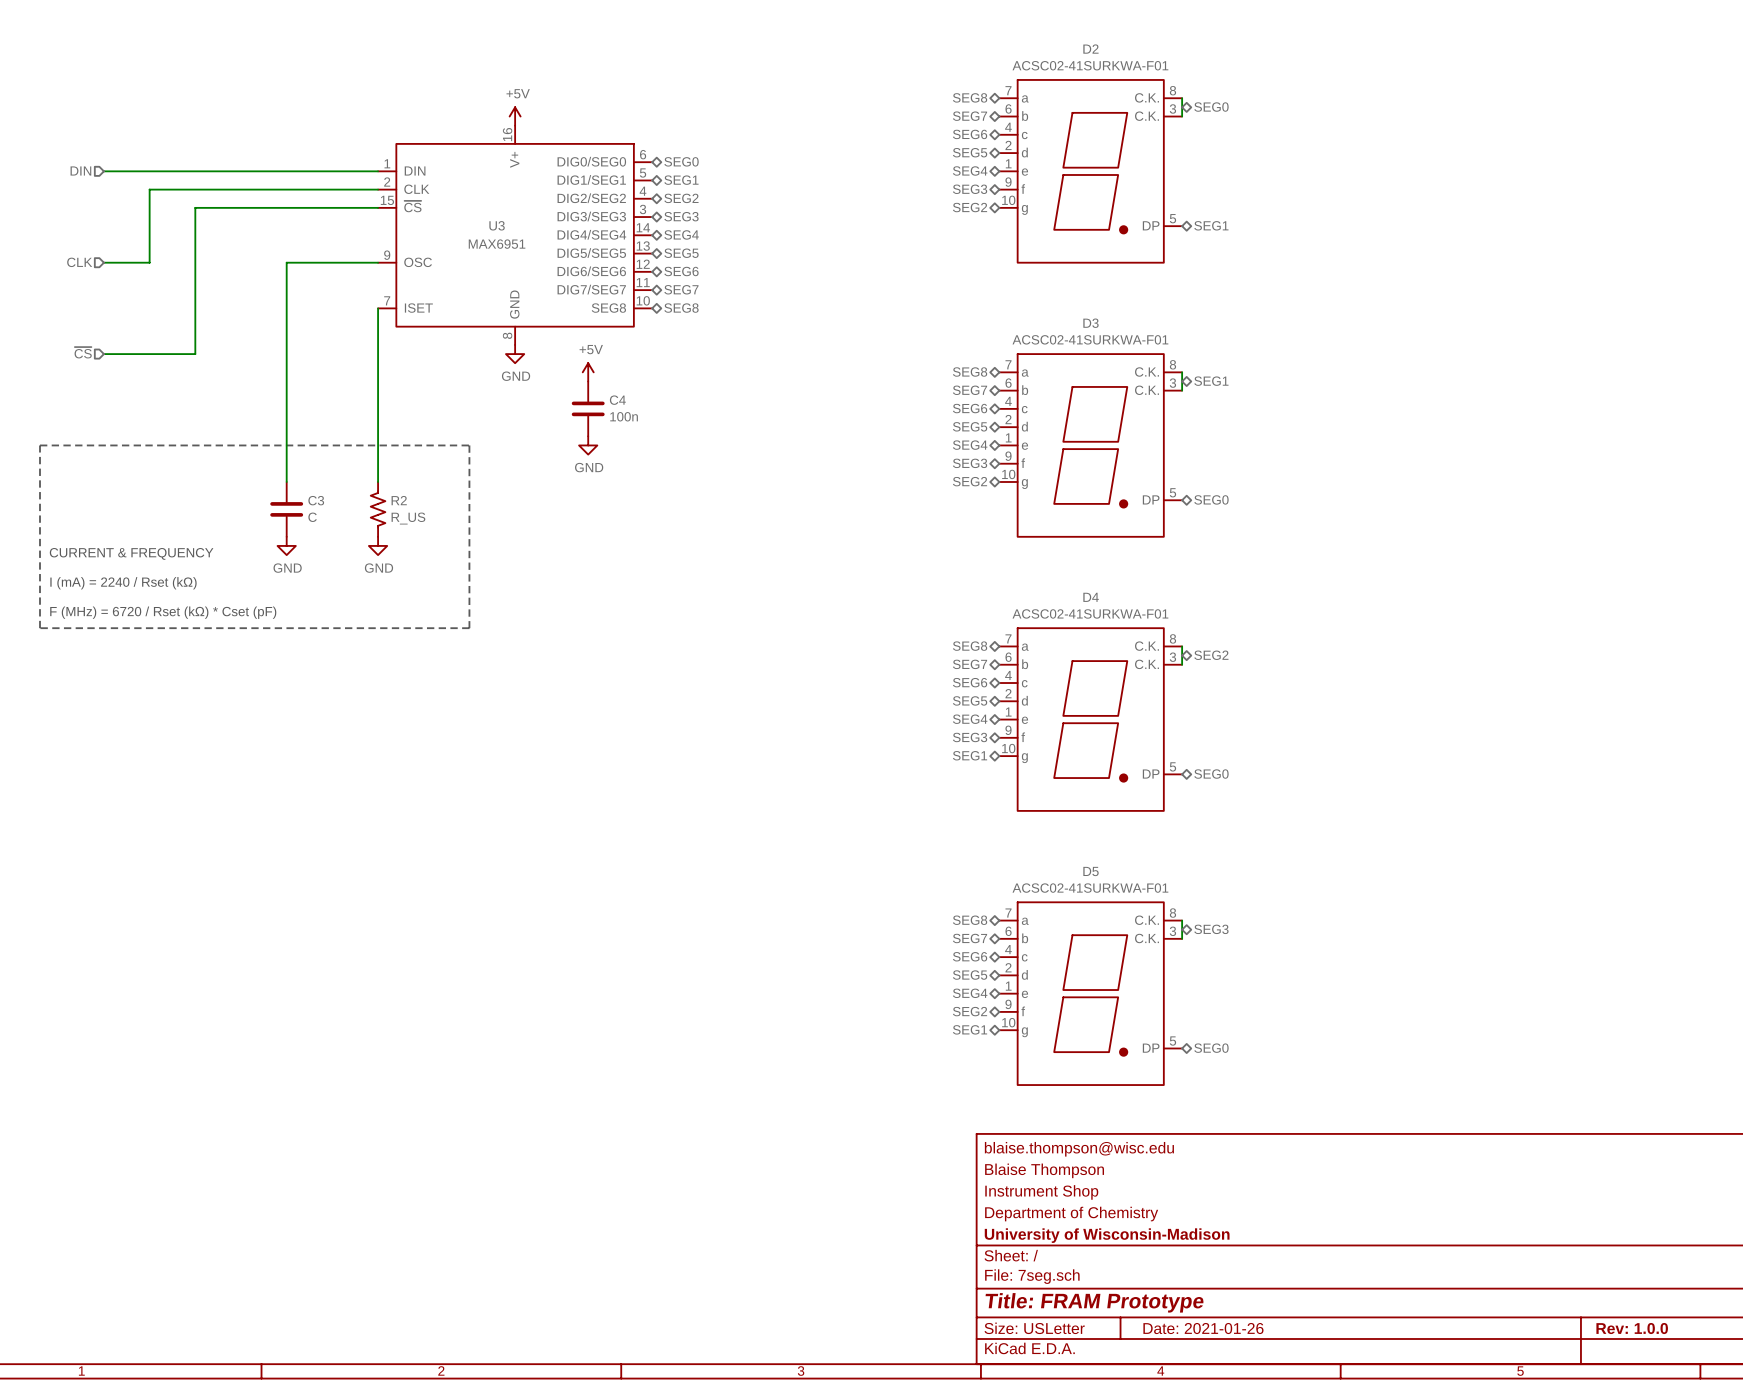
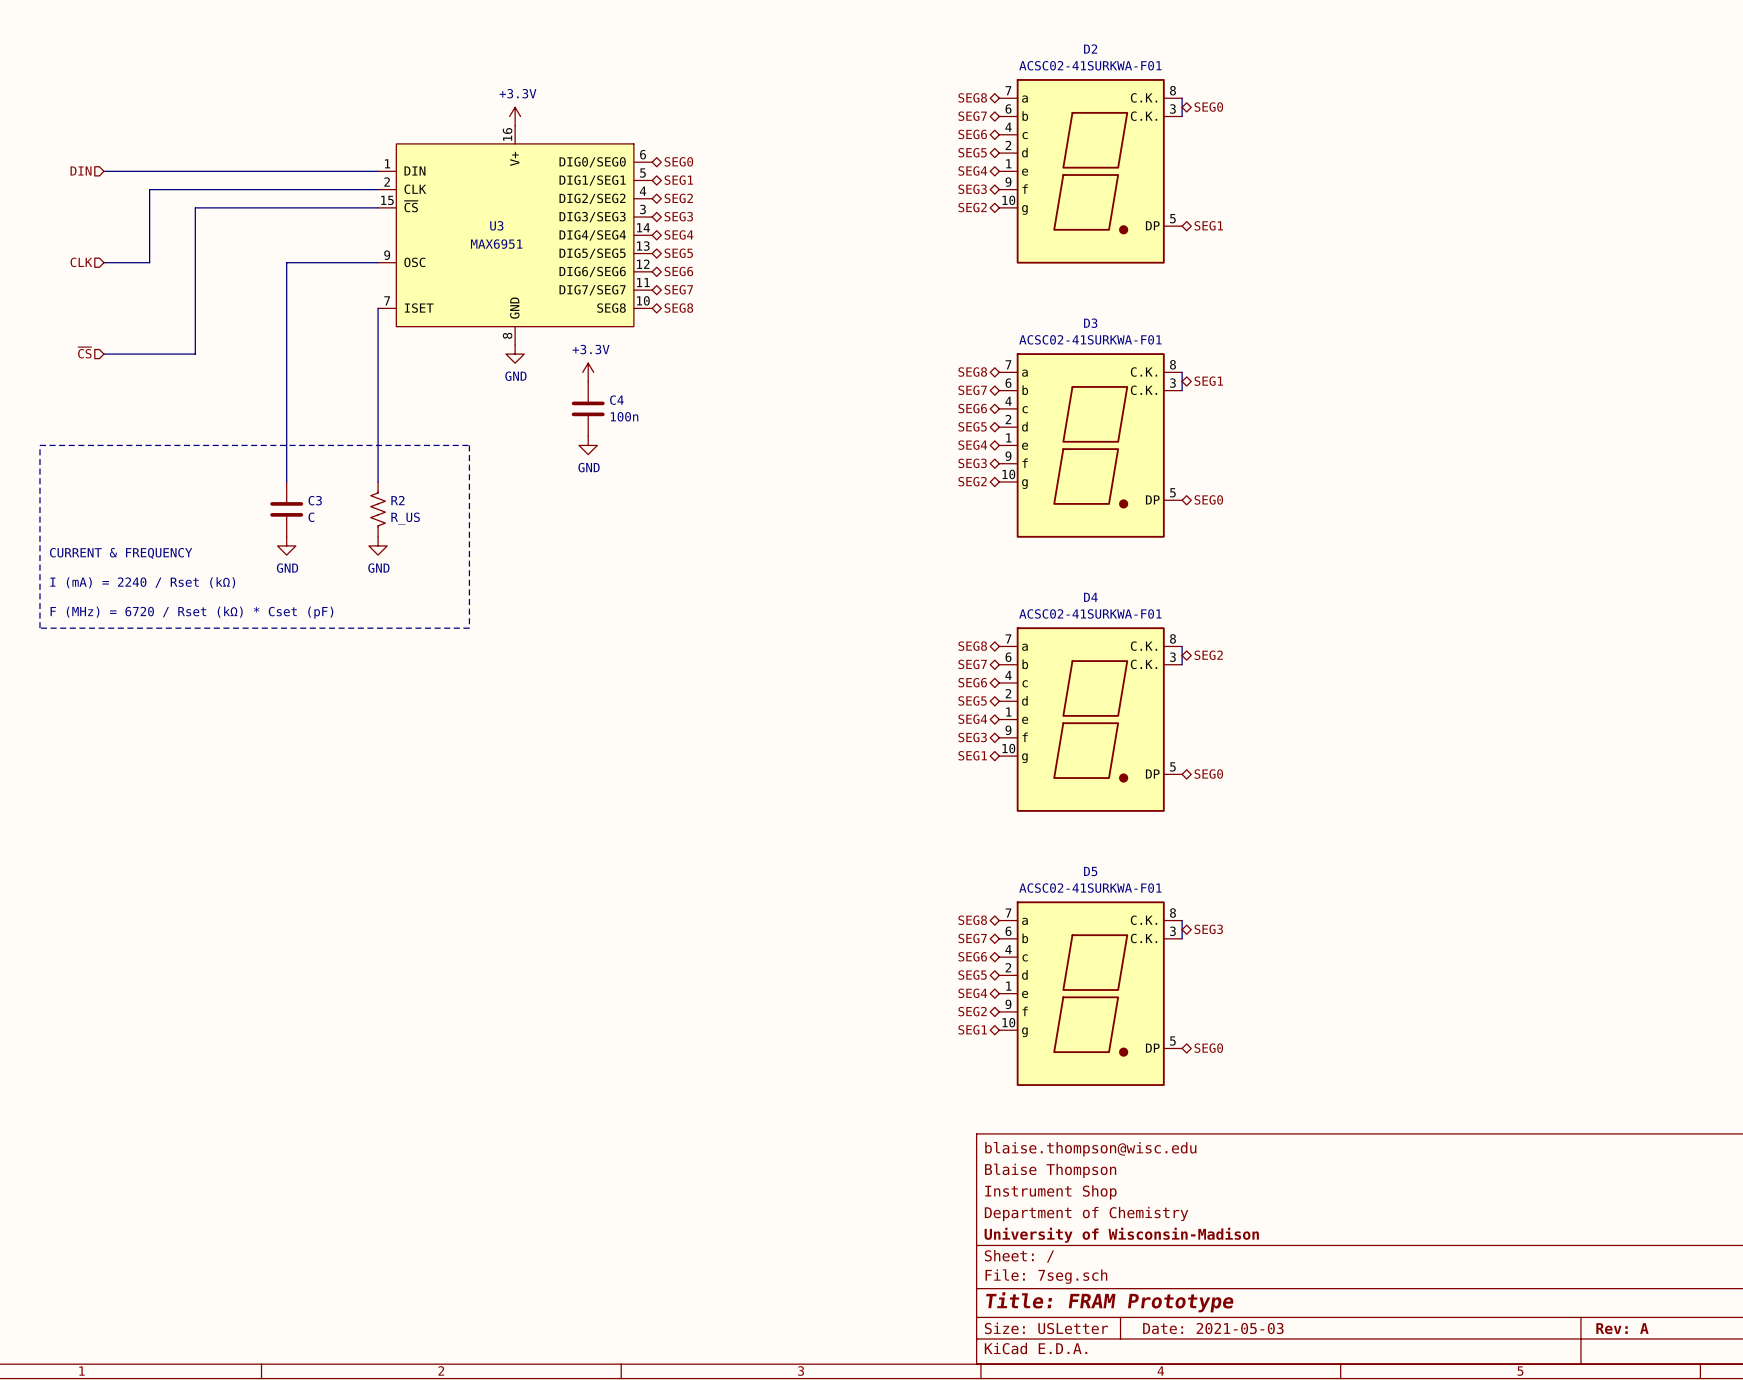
power symbol: +5V (515, 116) -> +3.3V (515, 116)
power symbol: +5V (588, 372) -> +3.3V (588, 372)
title block: Date: 2021-01-26 (1203, 1328) -> Date: 2021-05-03 (1213, 1328)
title block: Rev: 1.0.0 (1632, 1328) -> Rev: A (1622, 1328)

